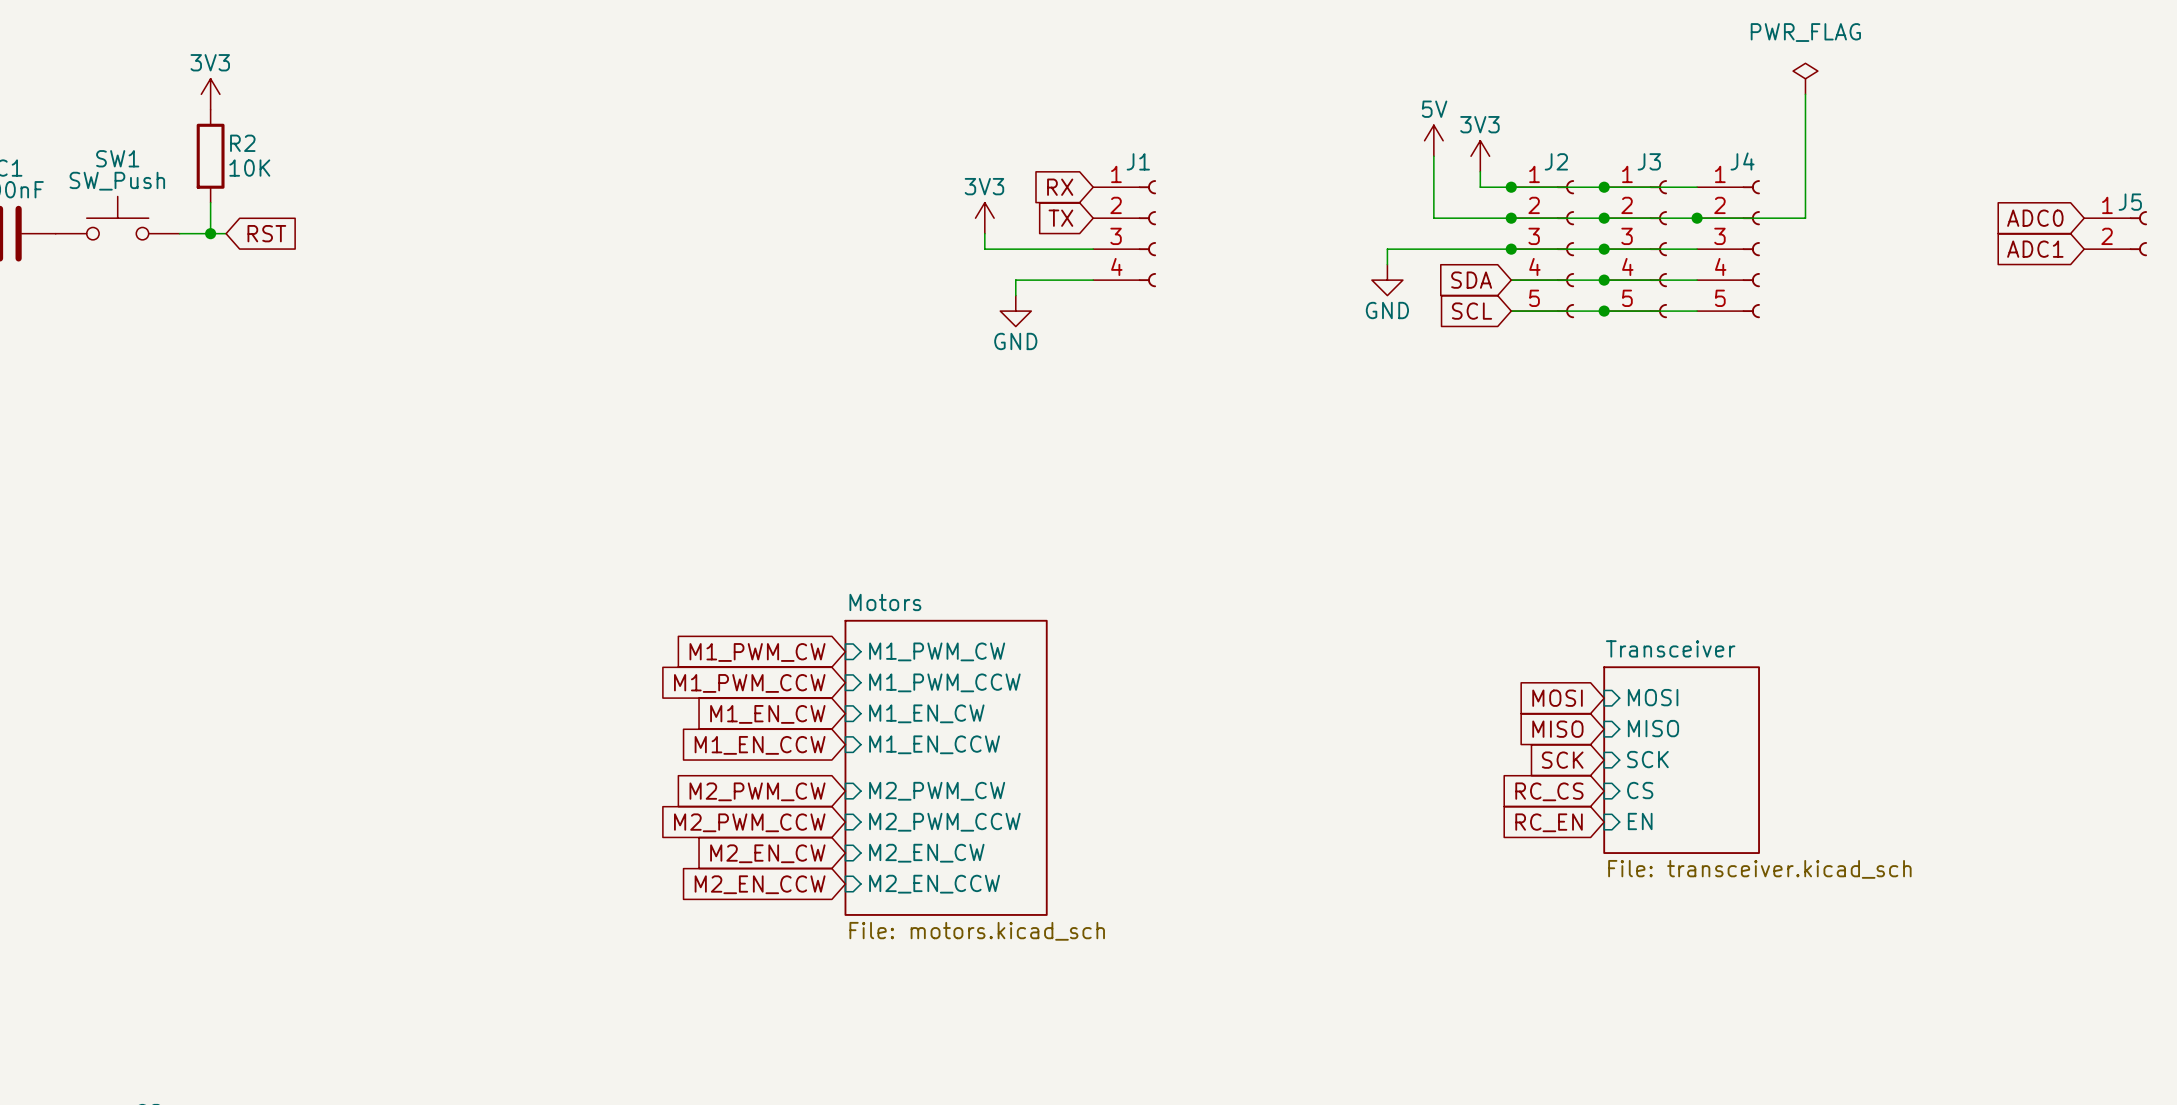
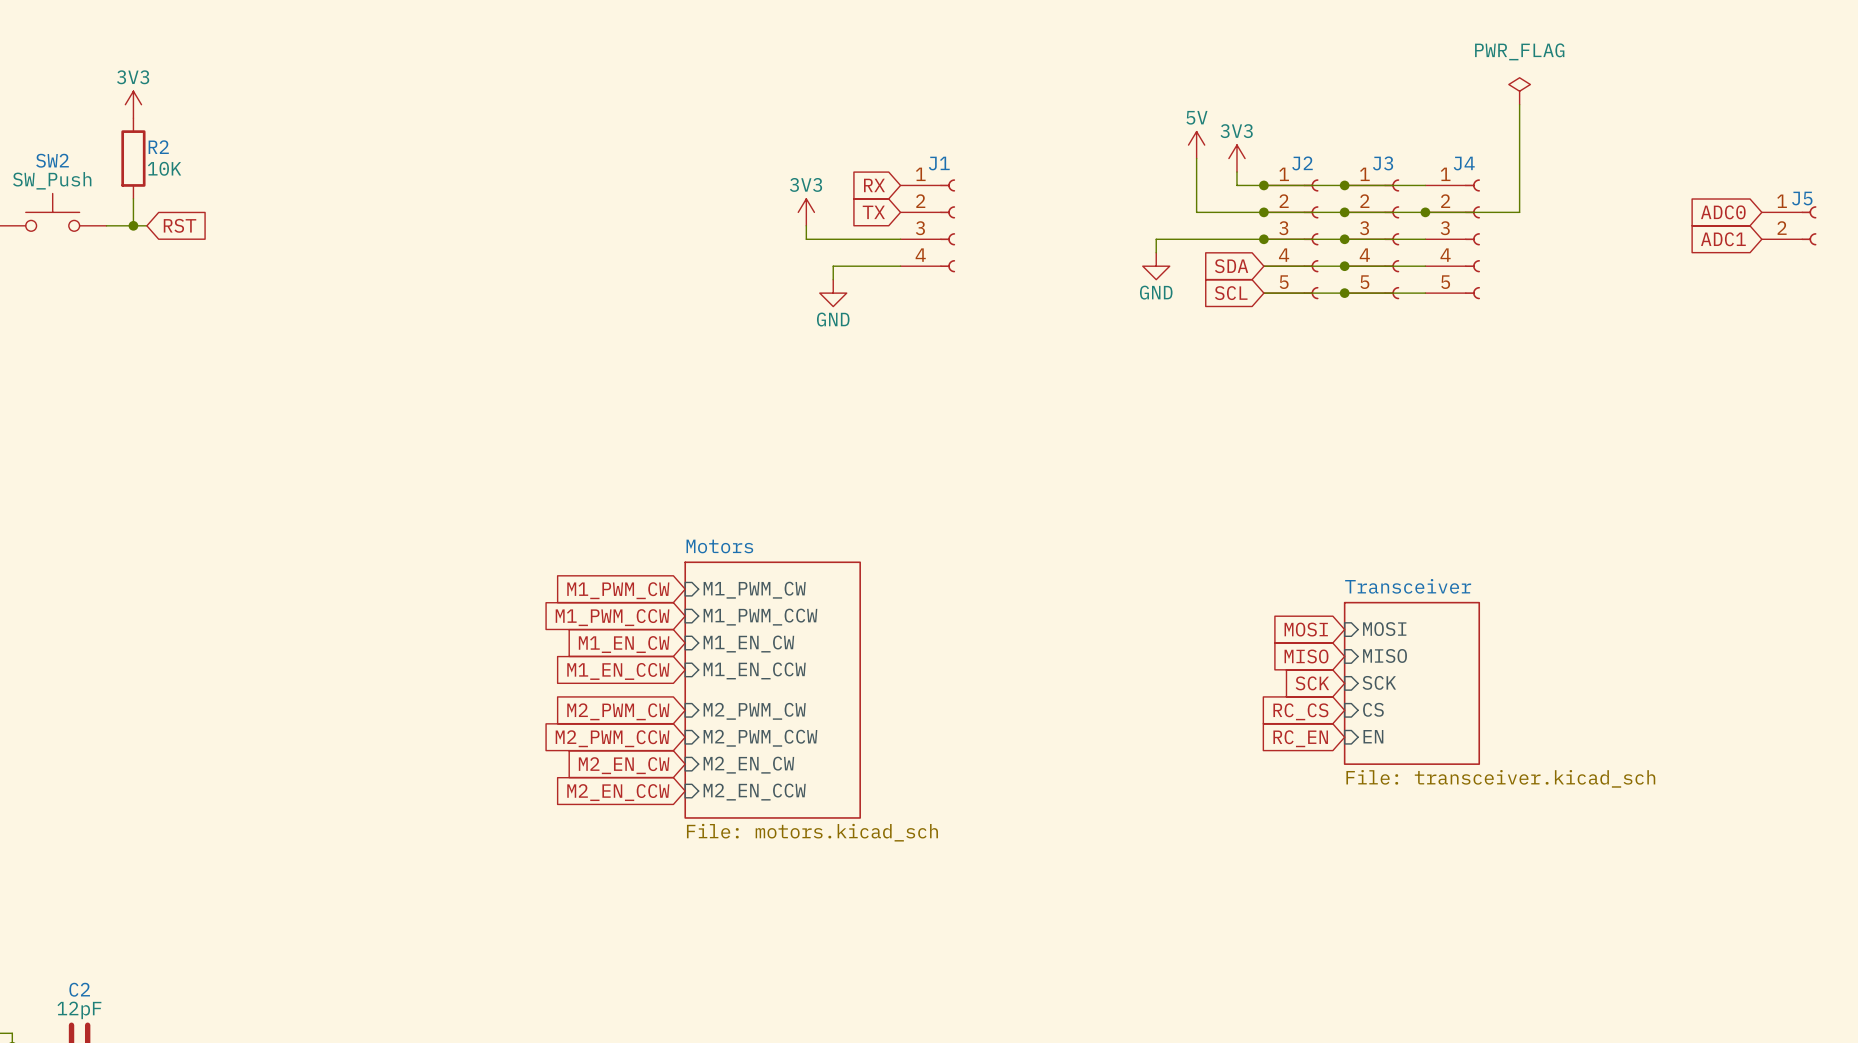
SW1 name: SW1 (117, 158) -> SW2 (52, 160)

